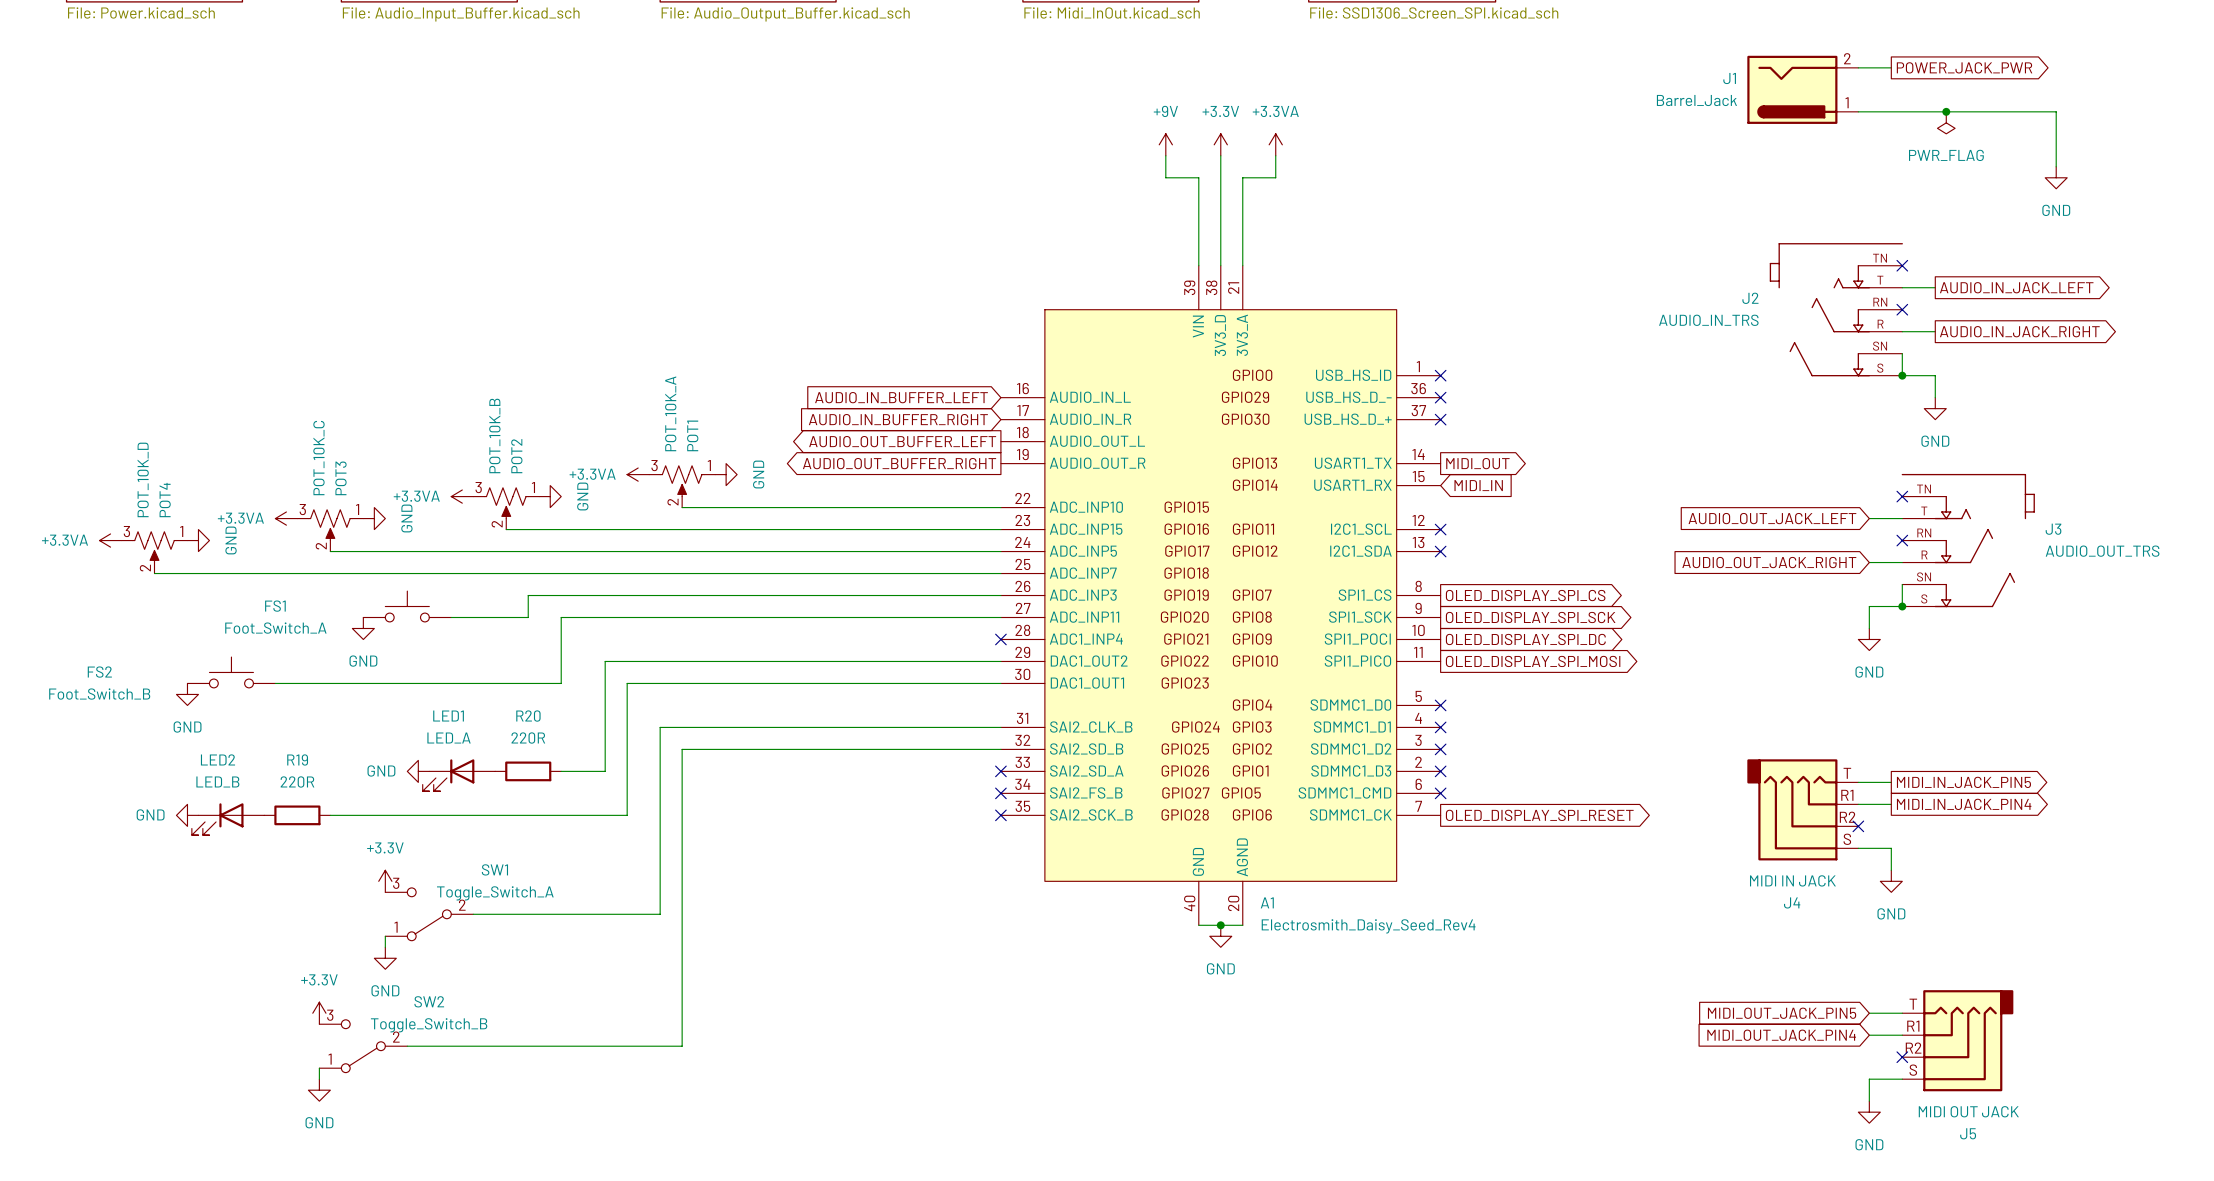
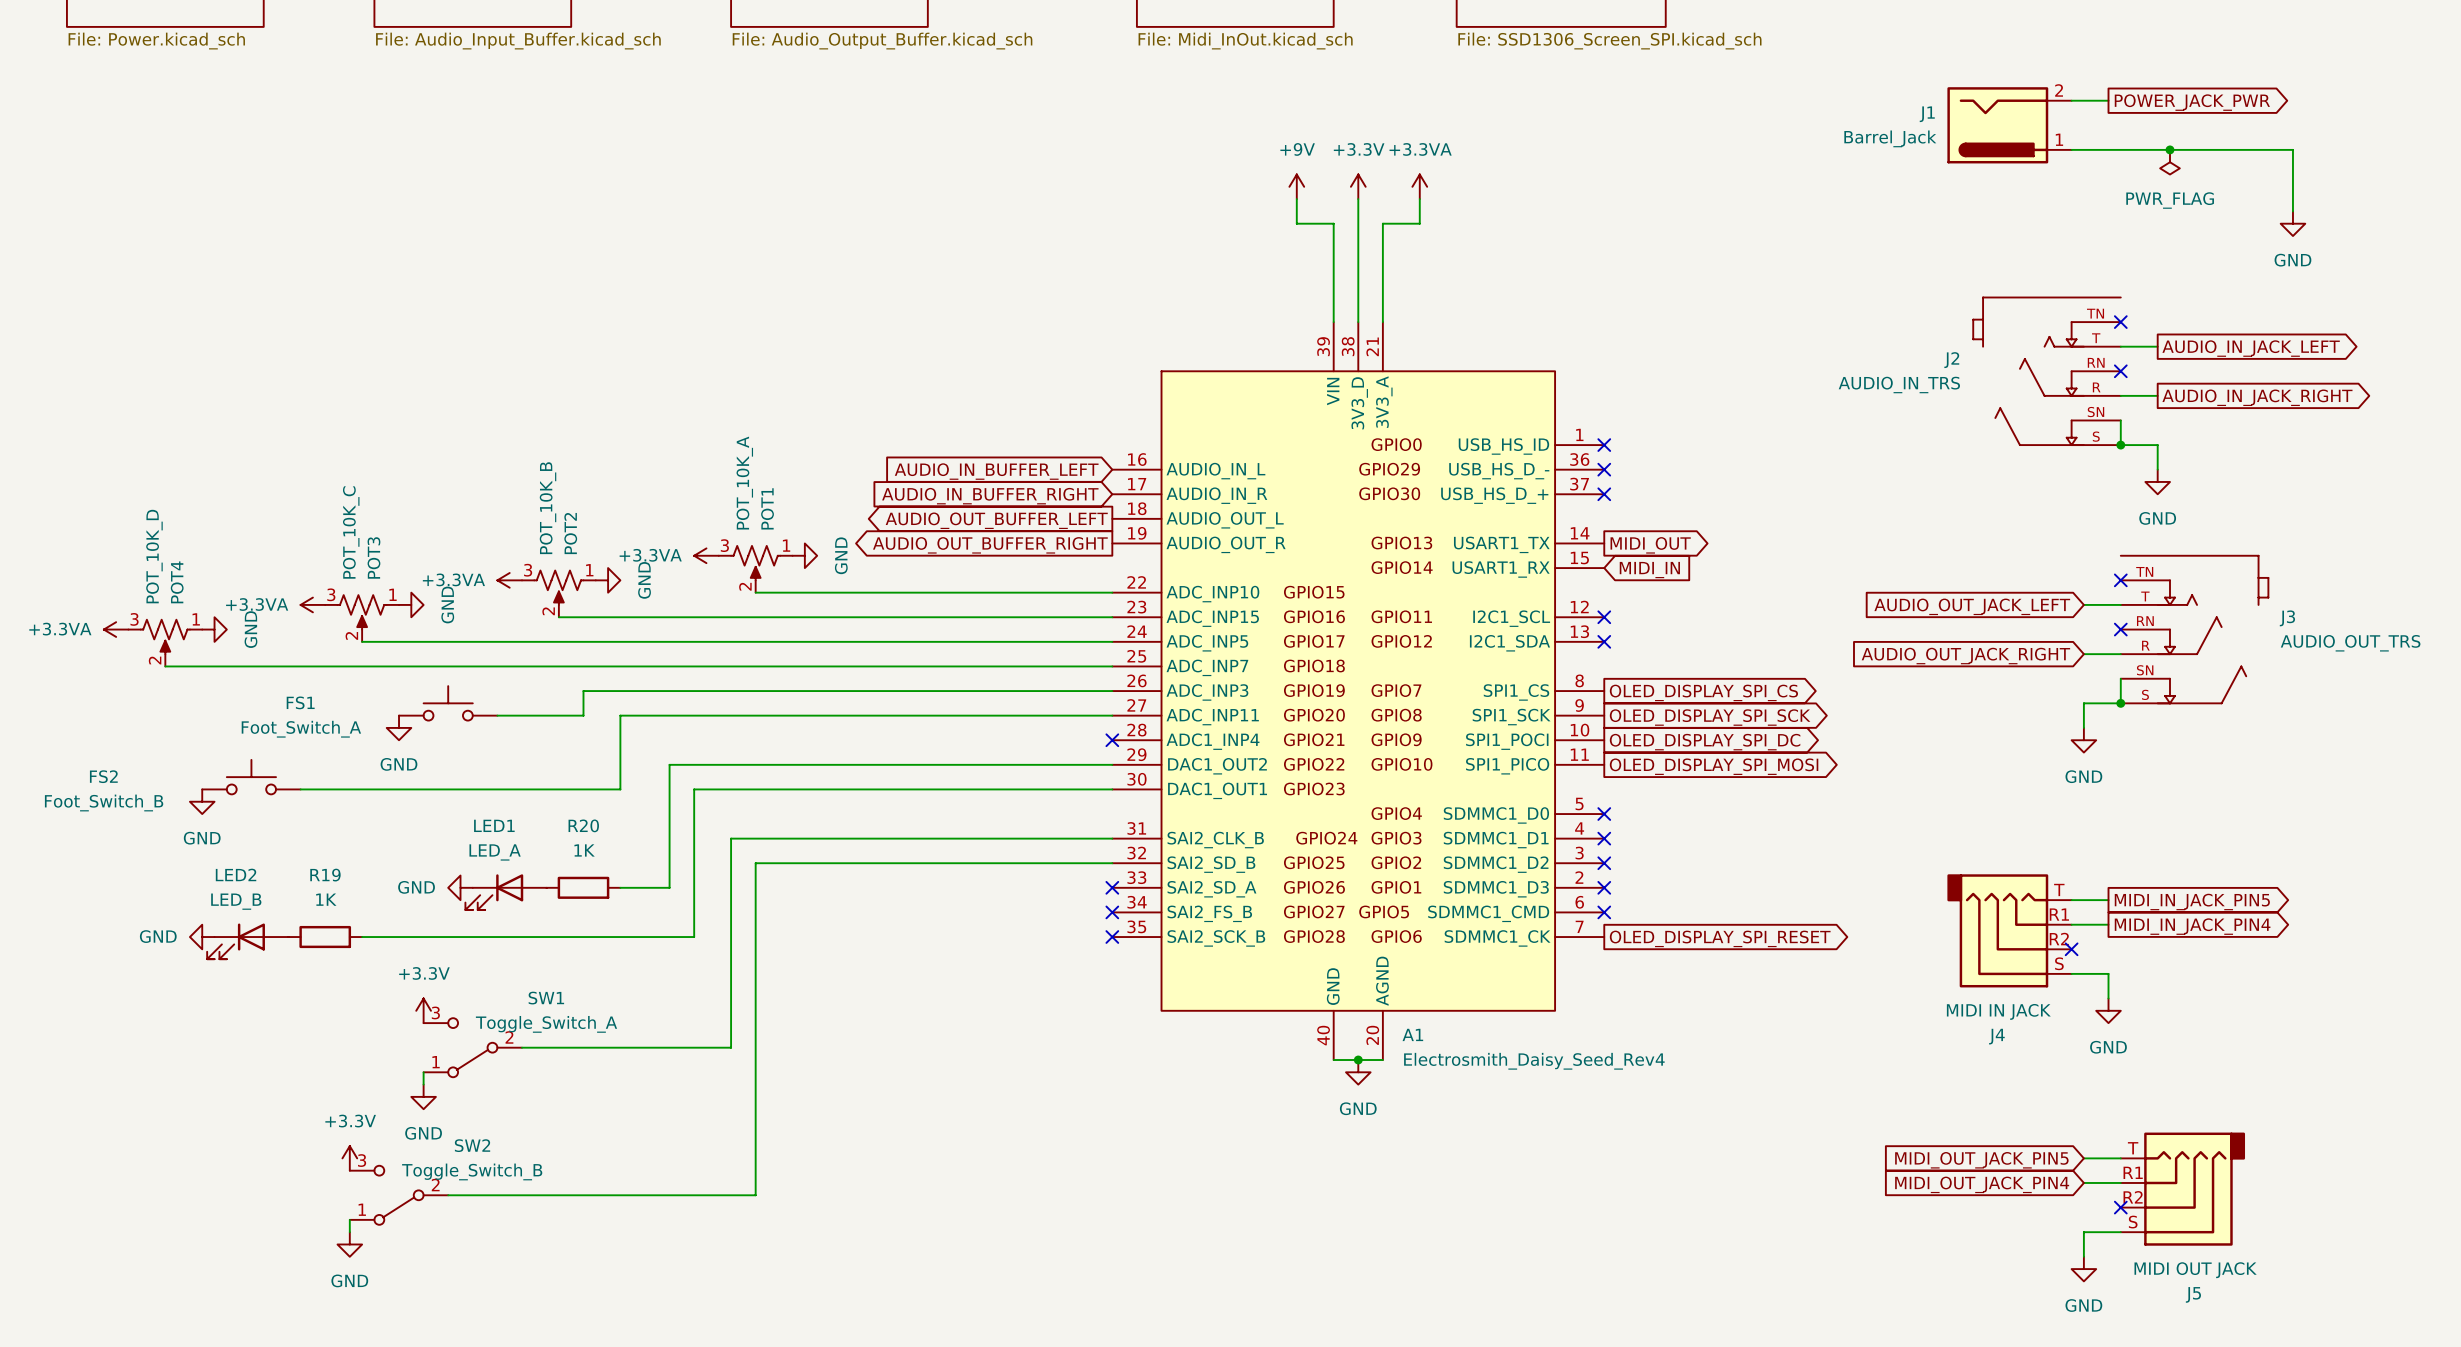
R20 value: 220R (528, 738) -> 1K (584, 850)
R19 value: 220R (297, 781) -> 1K (326, 899)

